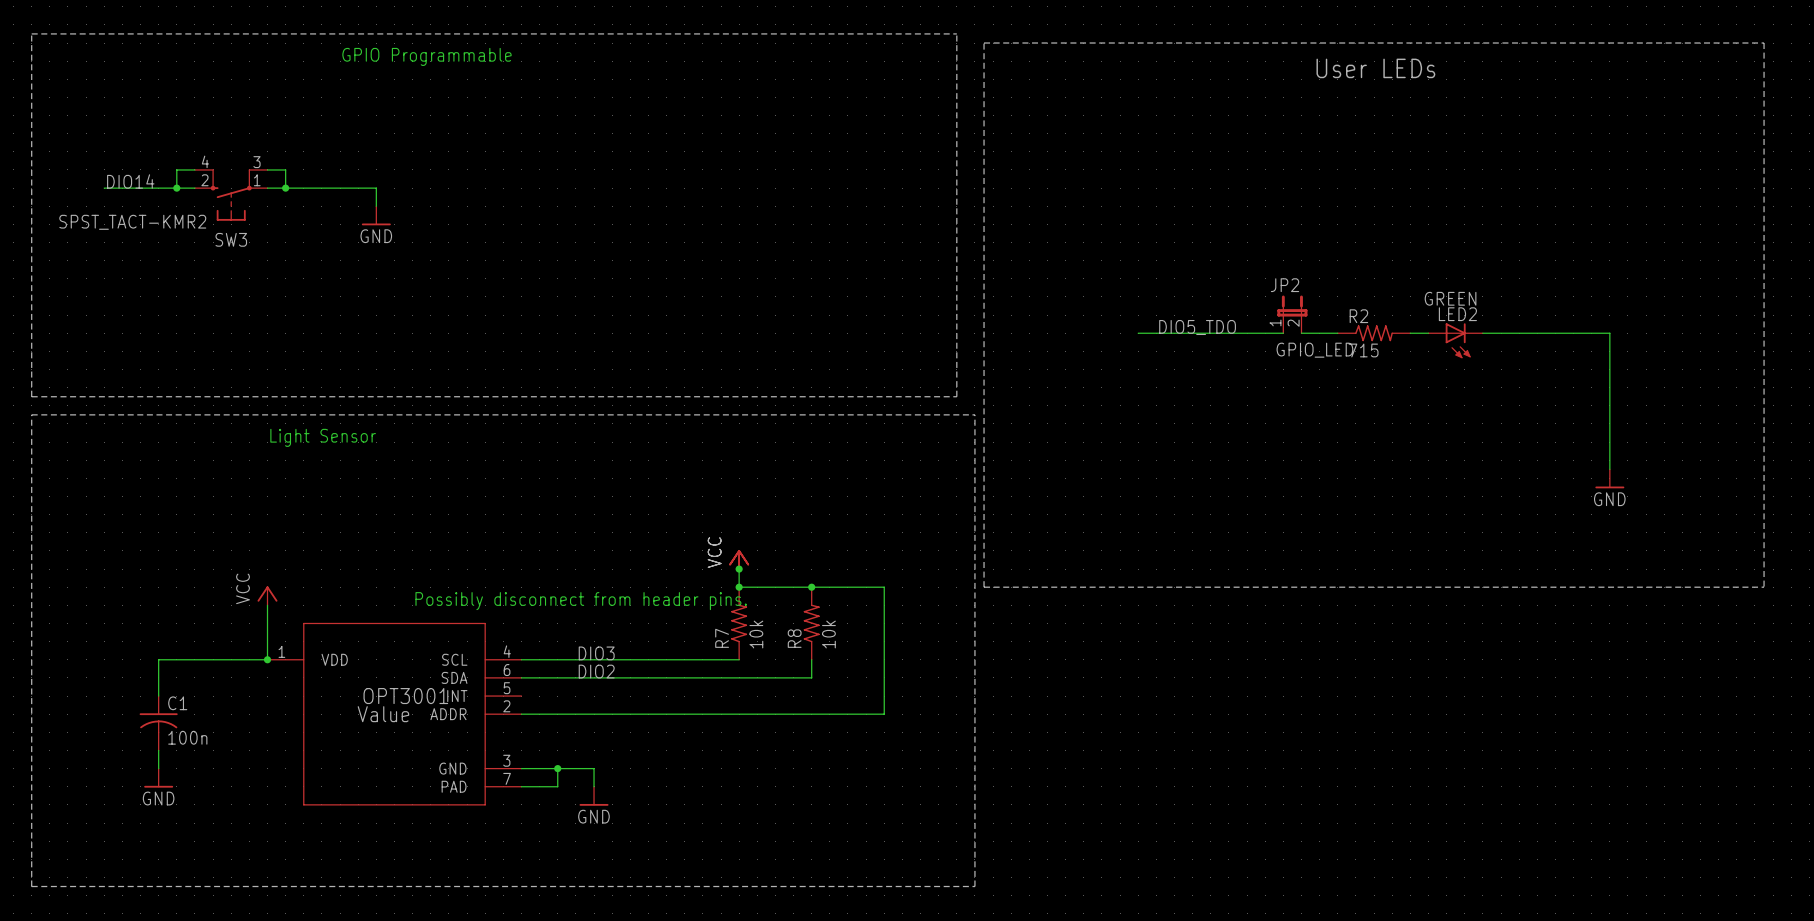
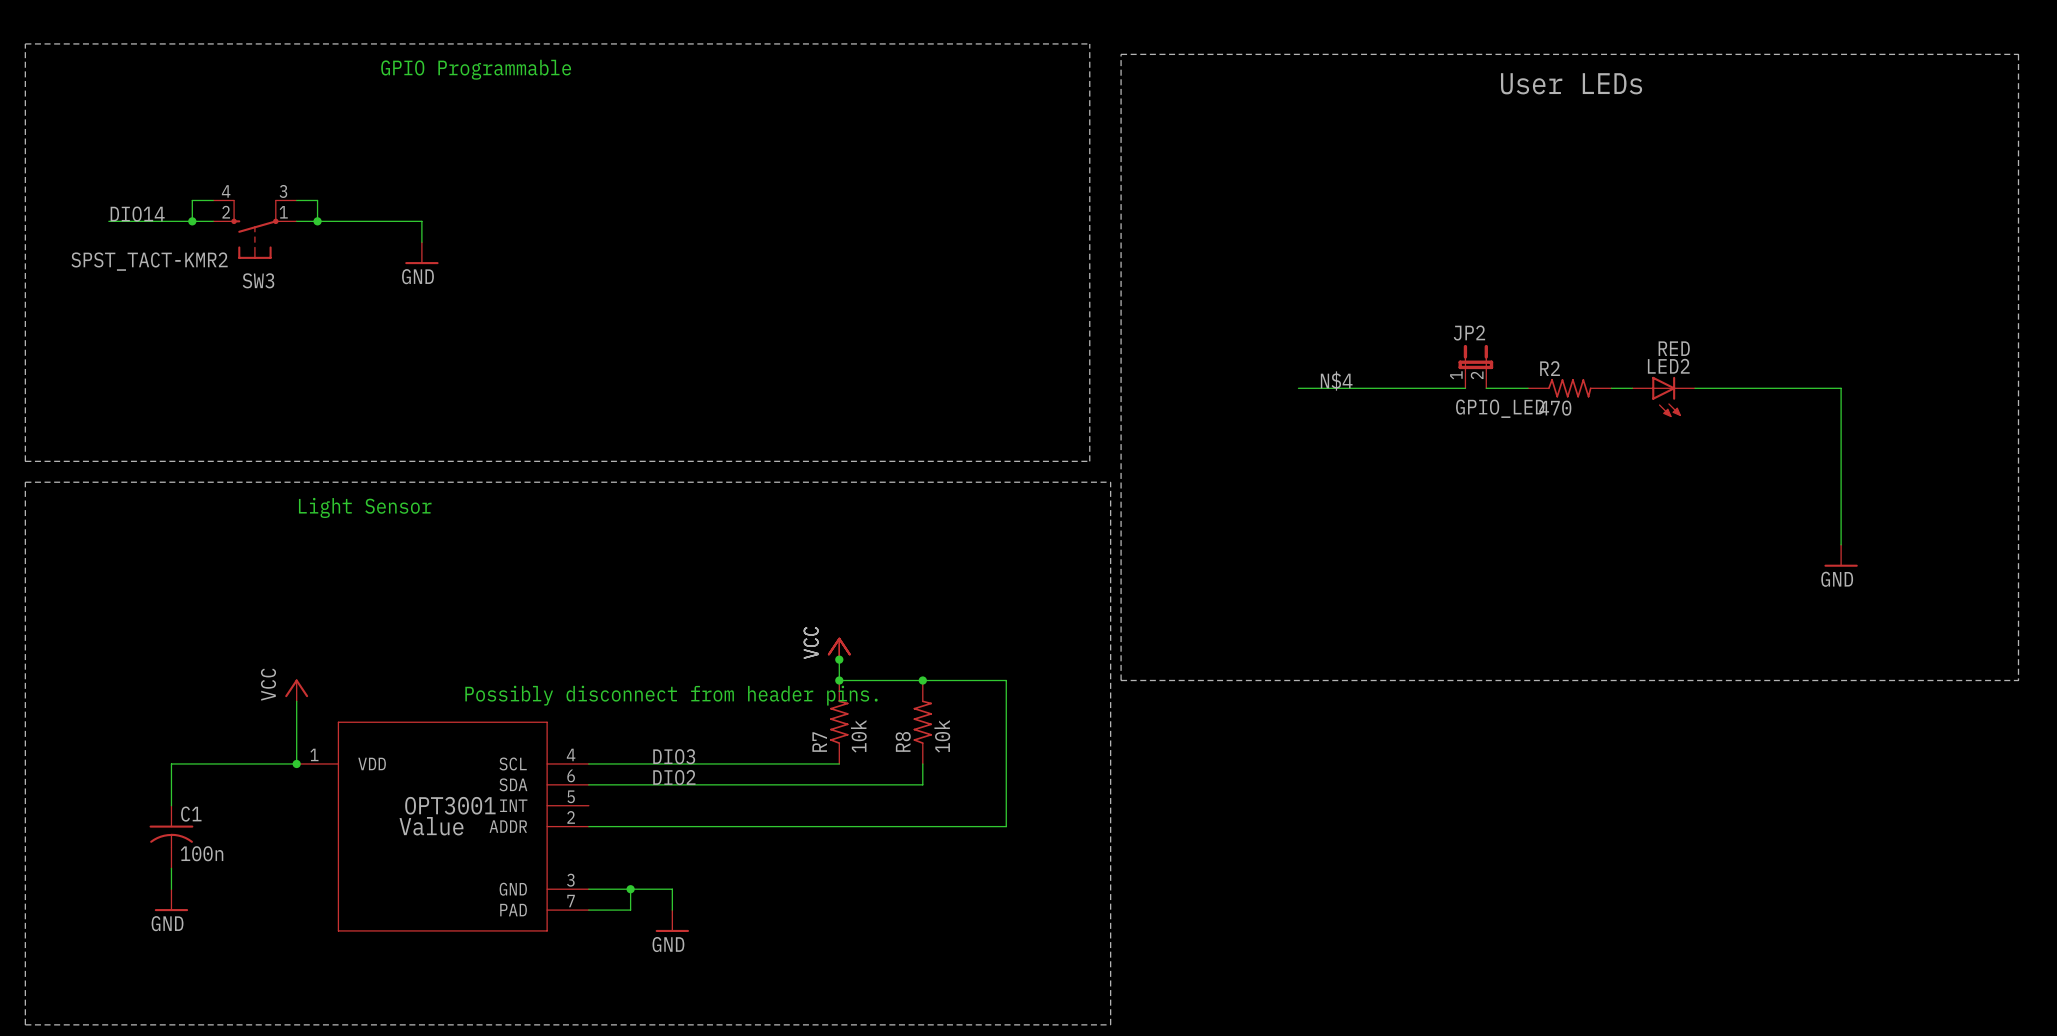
LED2 value: GREEN (1450, 298) -> RED (1674, 348)
label: DIO5_TDO (1197, 327) -> N$4 (1336, 381)
R2 value: 715 (1363, 350) -> 470 (1555, 408)

